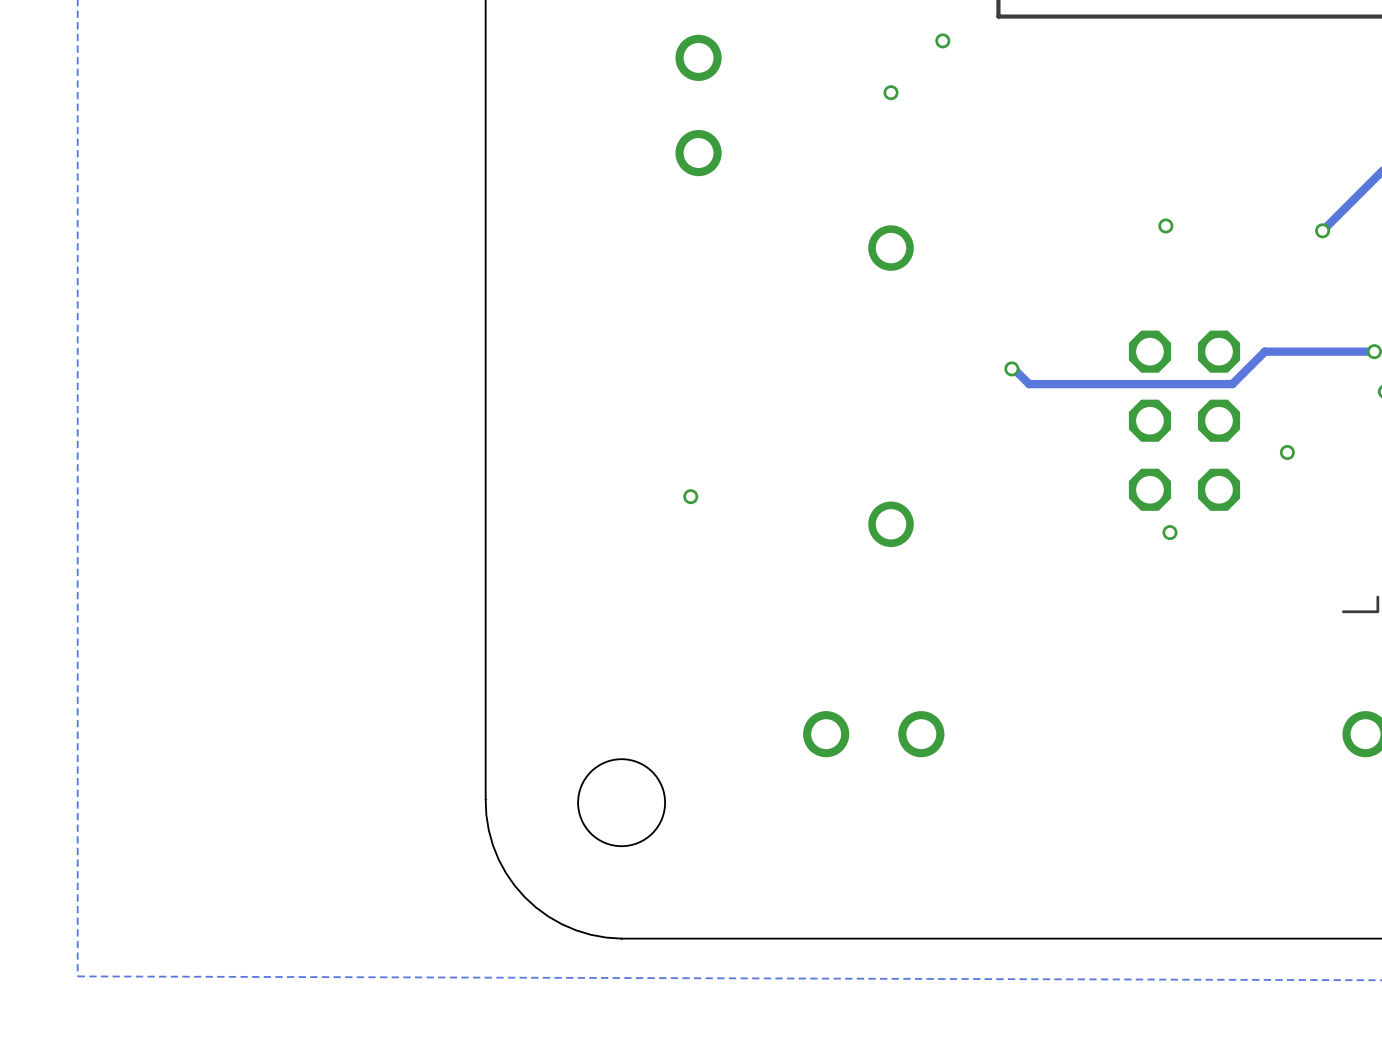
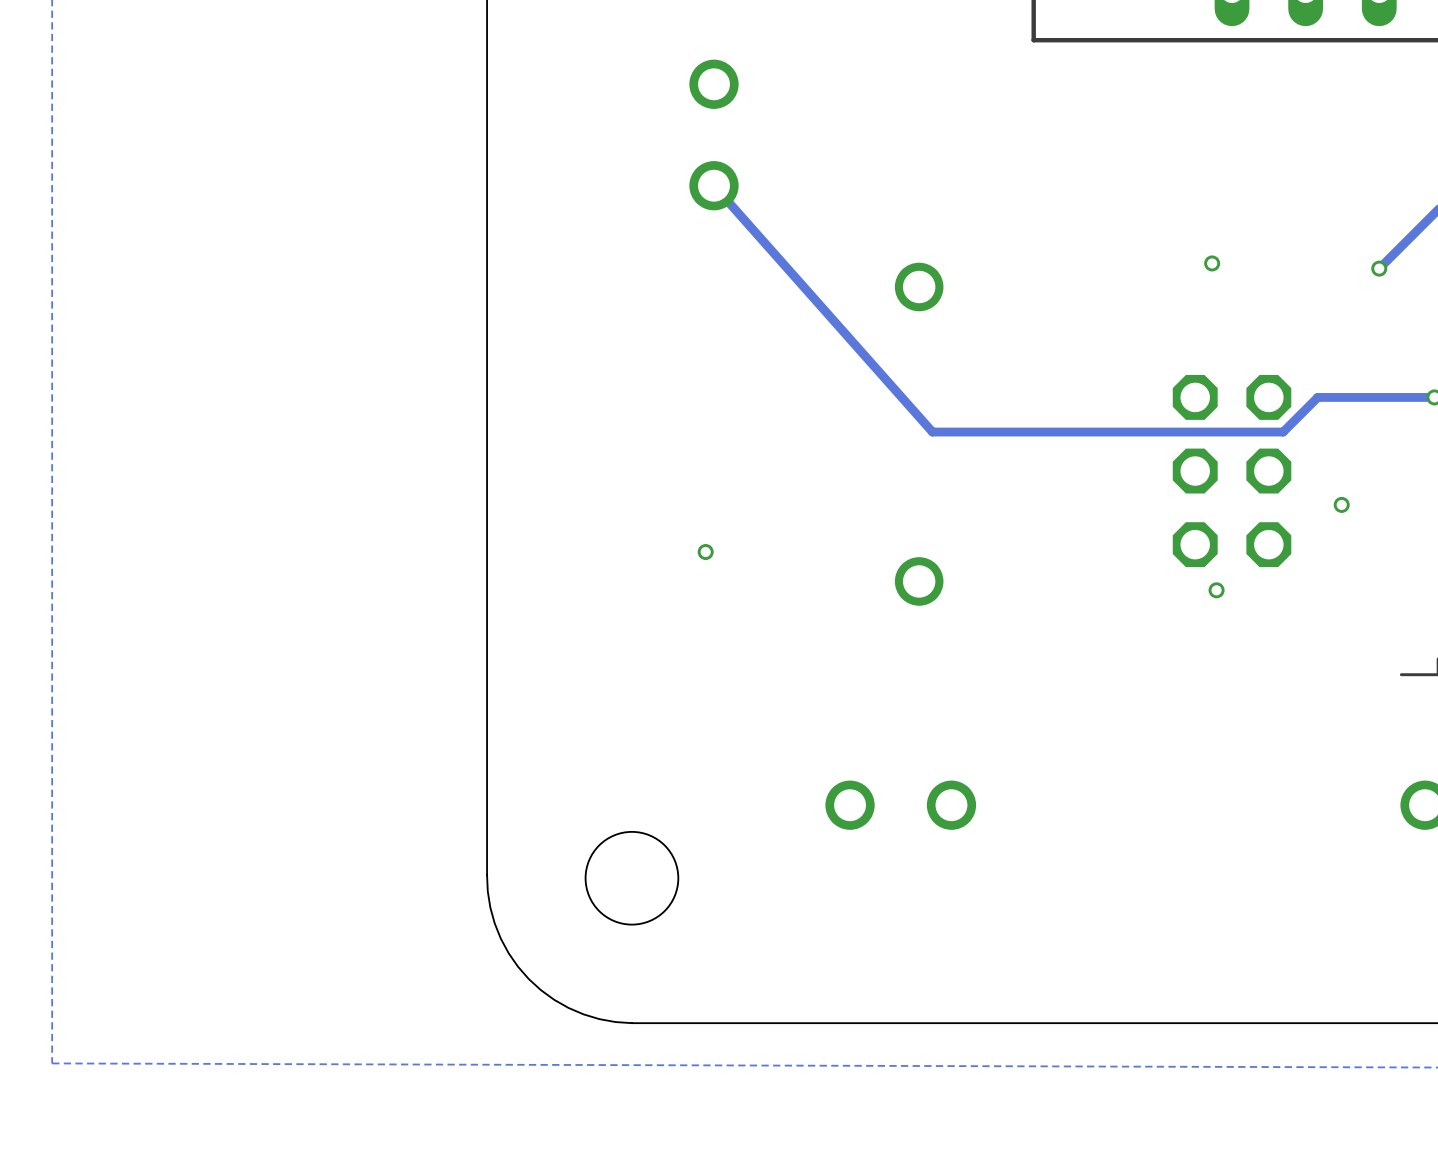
via: (942, 40) -> none
via: (891, 92) -> none
track: (1011, 368) (1029, 384) -> (714, 185) (932, 432) (1066, 432)
via: (1011, 368) -> none

